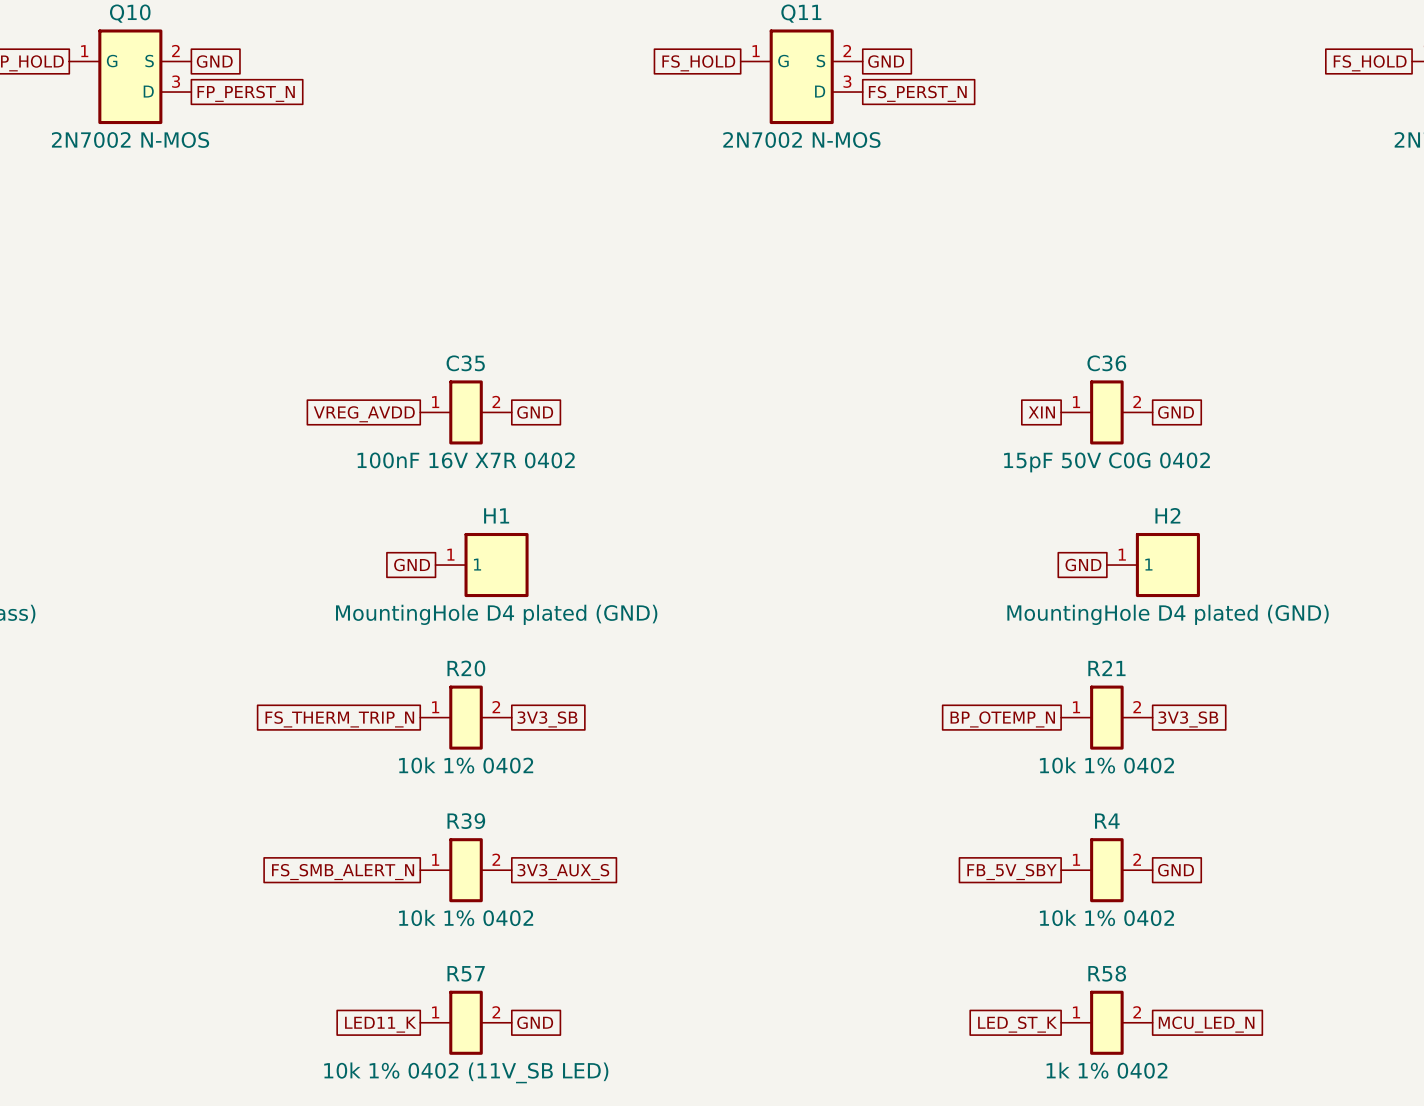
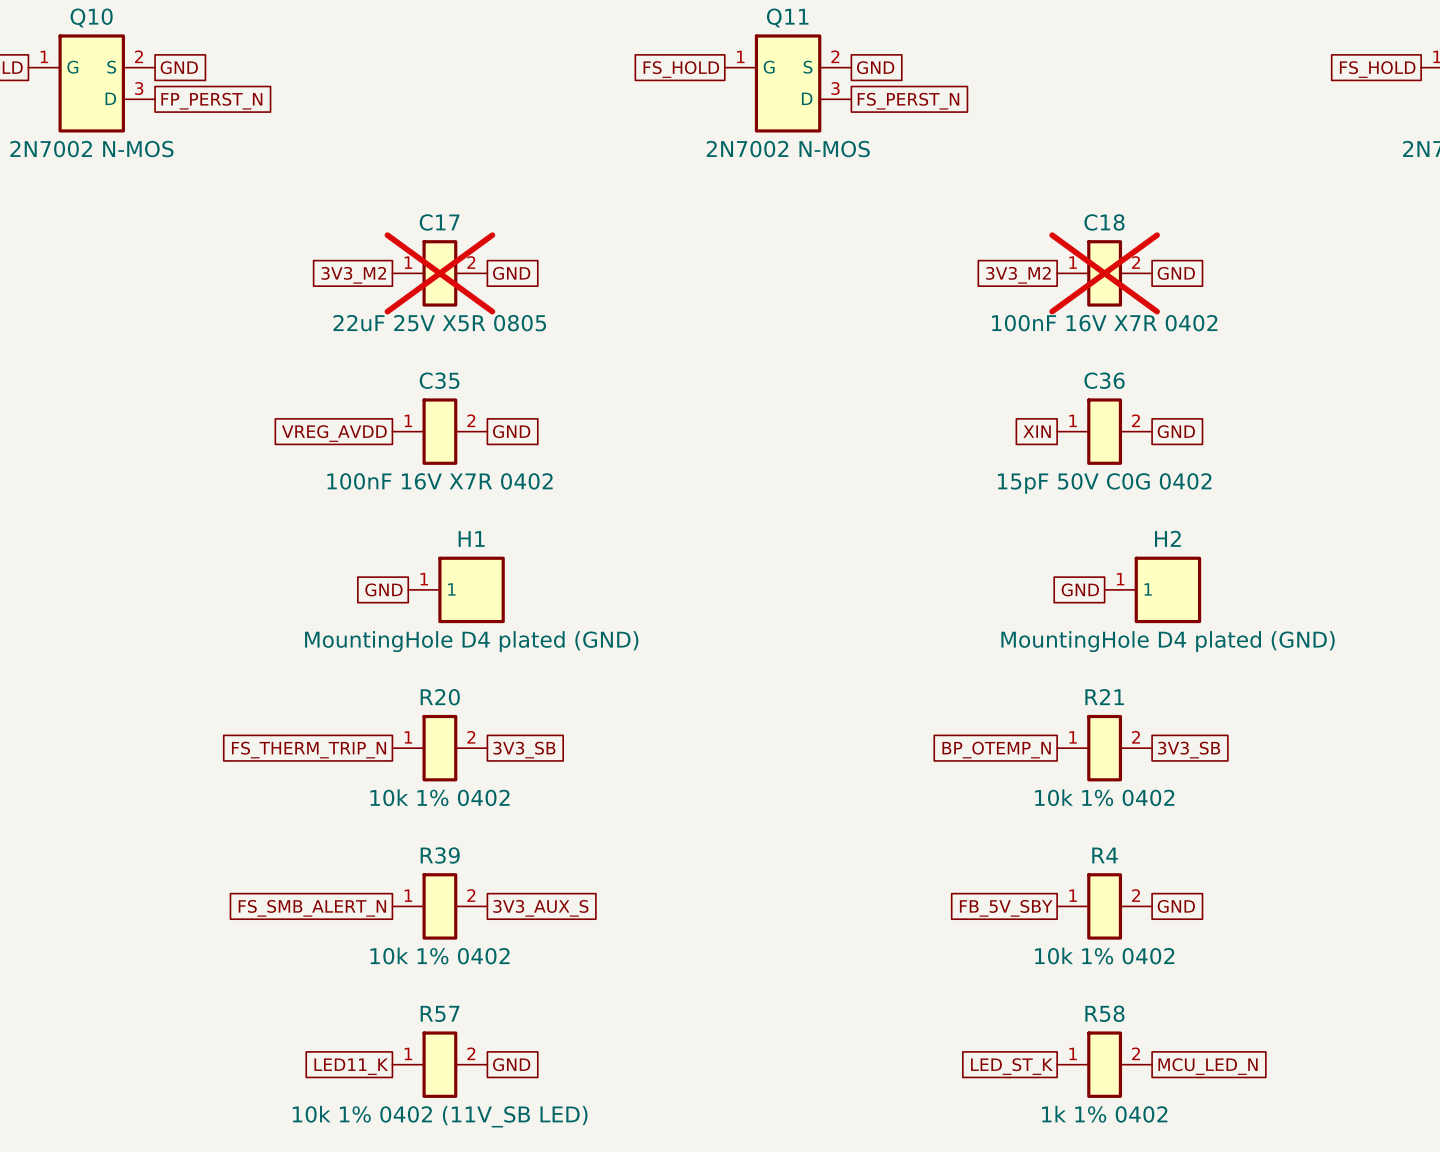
C17: none -> 22uF 25V X5R 0805 (439, 273)
global label: none -> GND (511, 273)
C18: none -> 100nF 16V X7R 0402 (1104, 273)
global label: none -> GND (1176, 273)
global label: none -> 3V3_M2 (353, 275)
global label: none -> 3V3_M2 (1018, 275)

